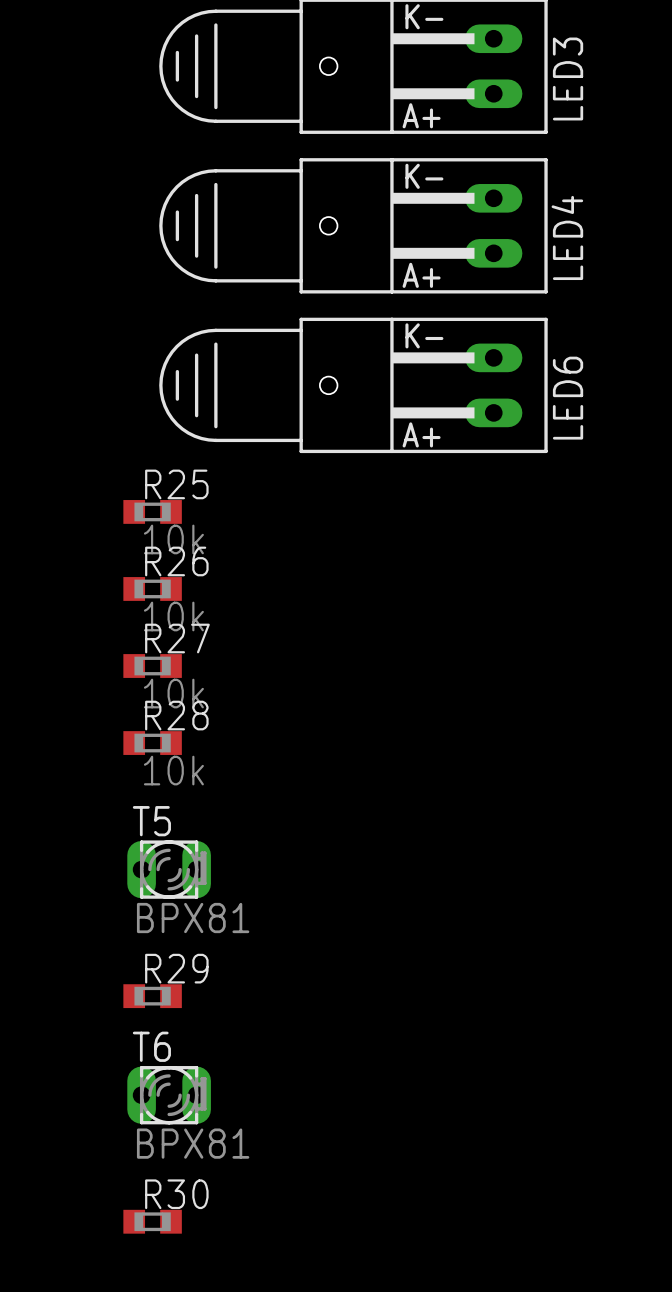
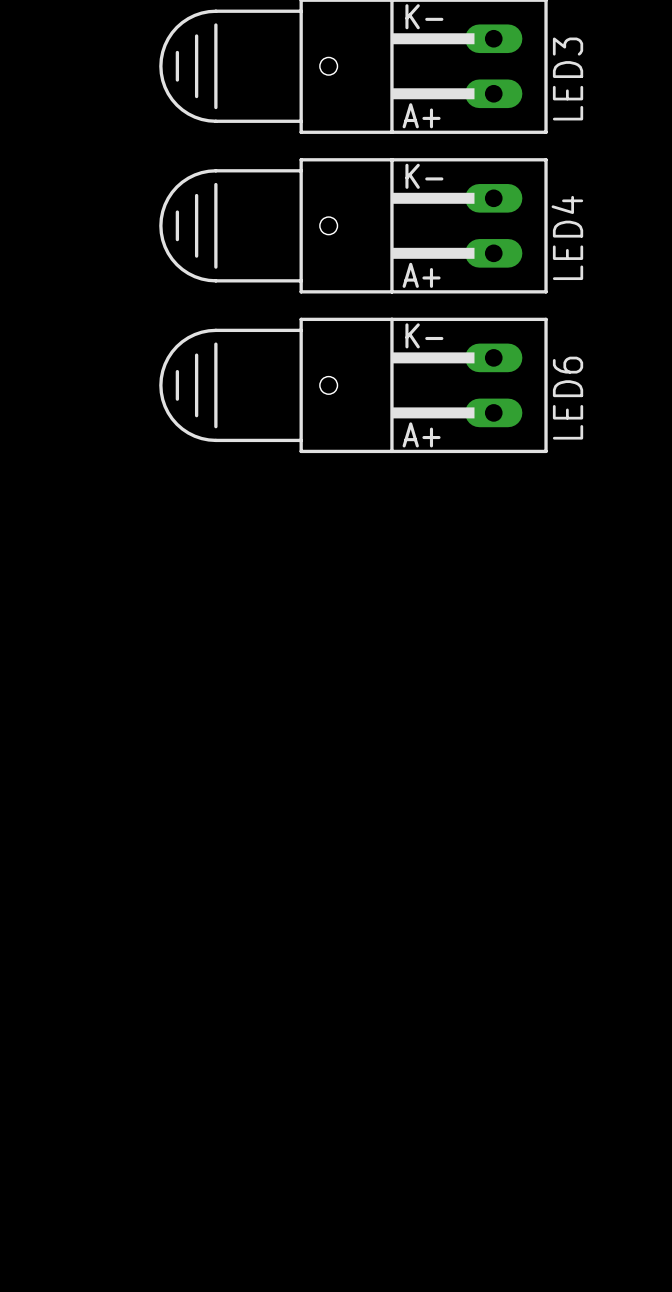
R25: 10k (152, 511) -> none
R26: 10k (152, 588) -> none
R27: 10k (152, 666) -> none
R28: 10k (152, 743) -> none
T5: BPX81 (169, 869) -> none
R29: (152, 996) -> none
T6: BPX81 (169, 1095) -> none
R30: (152, 1221) -> none

